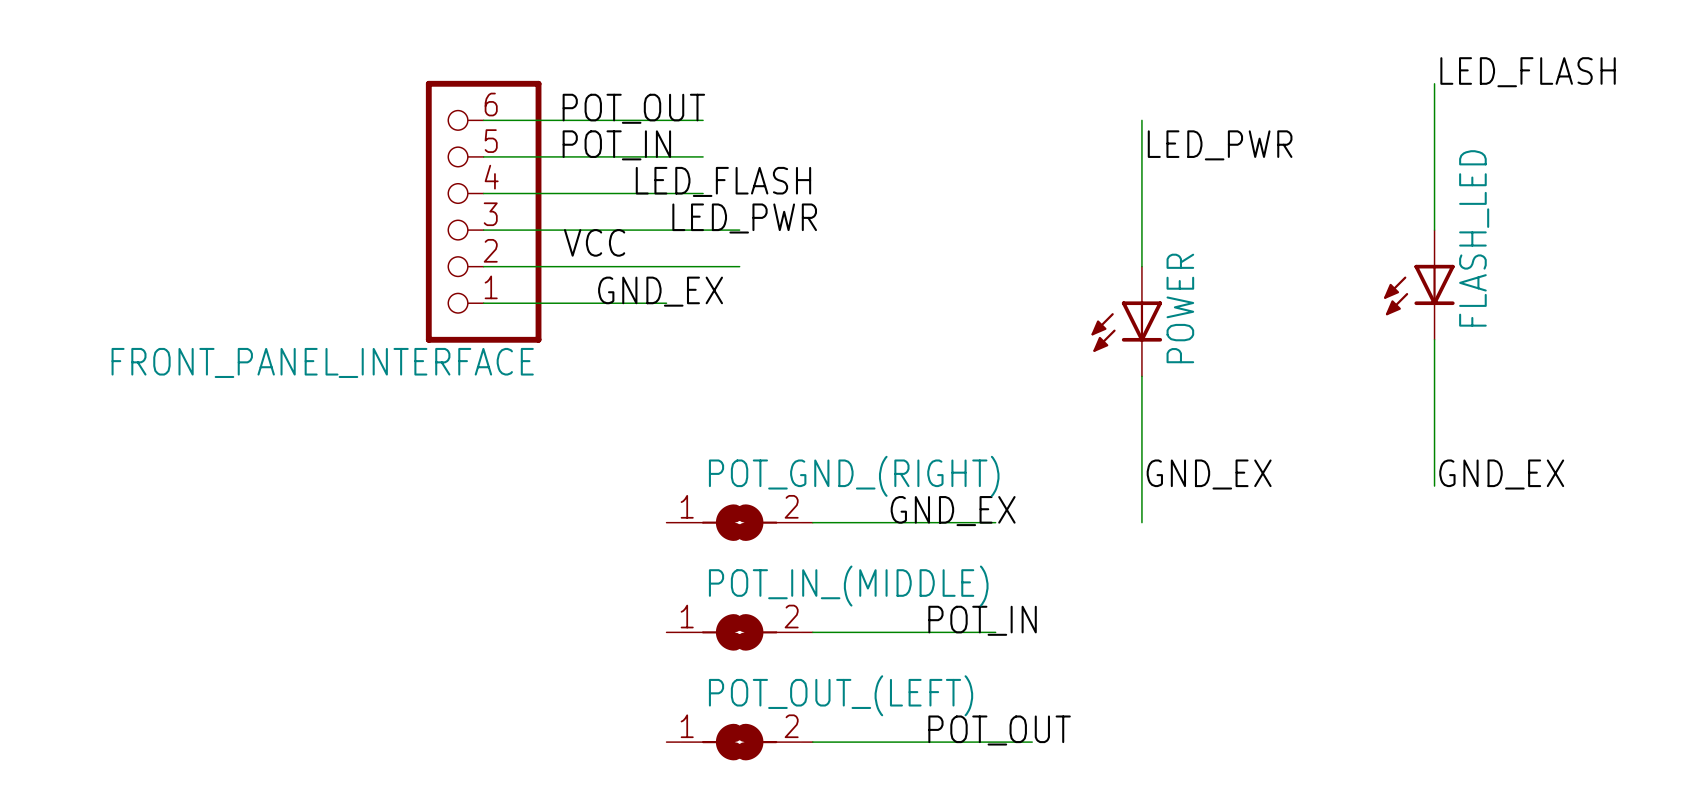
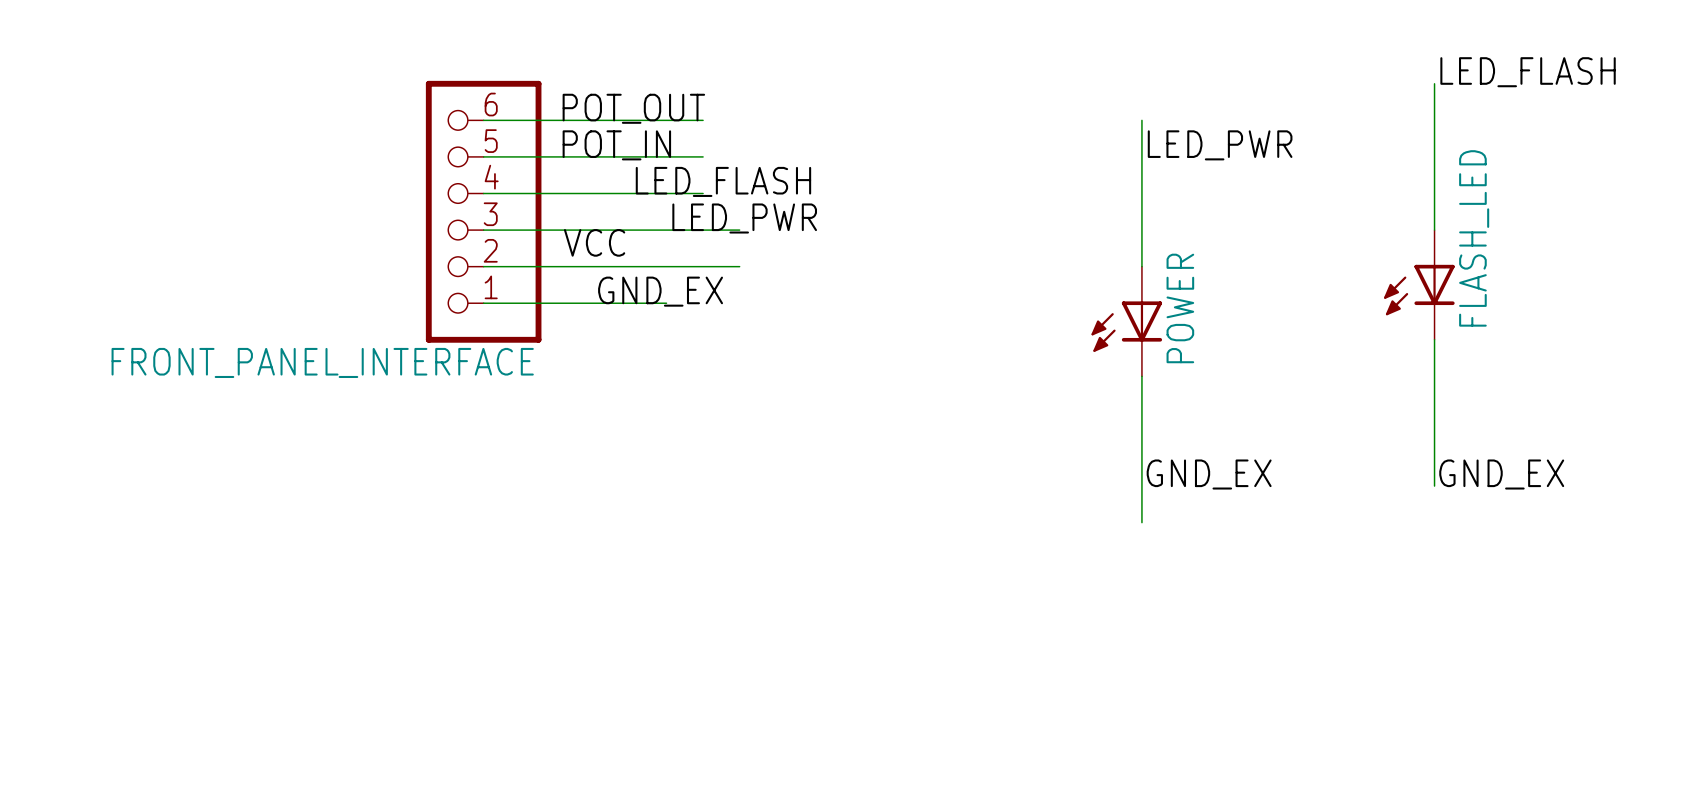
label: GND_EX (953, 511) -> none
POT_GND_(RIGHT): (739, 522) -> none
wire: (812, 522) (995, 522) -> none
label: POT_IN (982, 620) -> none
POT_IN_(MIDDLE): (739, 632) -> none
wire: (812, 632) (995, 632) -> none
label: POT_OUT (999, 730) -> none
POT_OUT_(LEFT): (739, 742) -> none
wire: (812, 742) (1032, 742) -> none

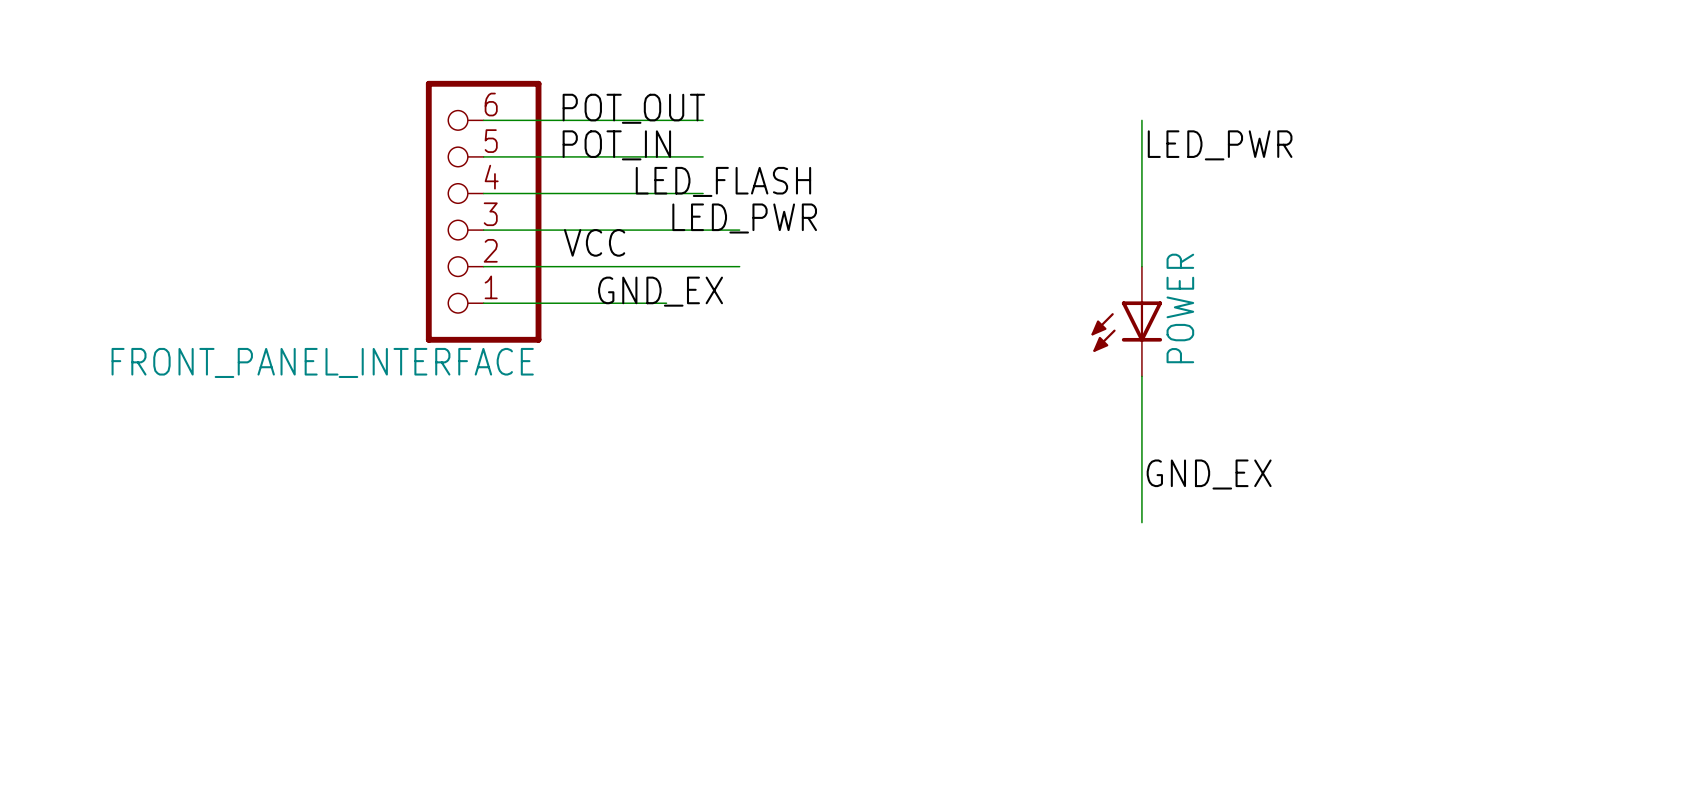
label: LED_FLASH (1528, 72) -> none
wire: (1434, 83) (1434, 230) -> none
FLASH_LED: (1419, 284) -> none
wire: (1434, 339) (1434, 486) -> none
label: GND_EX (1501, 474) -> none

